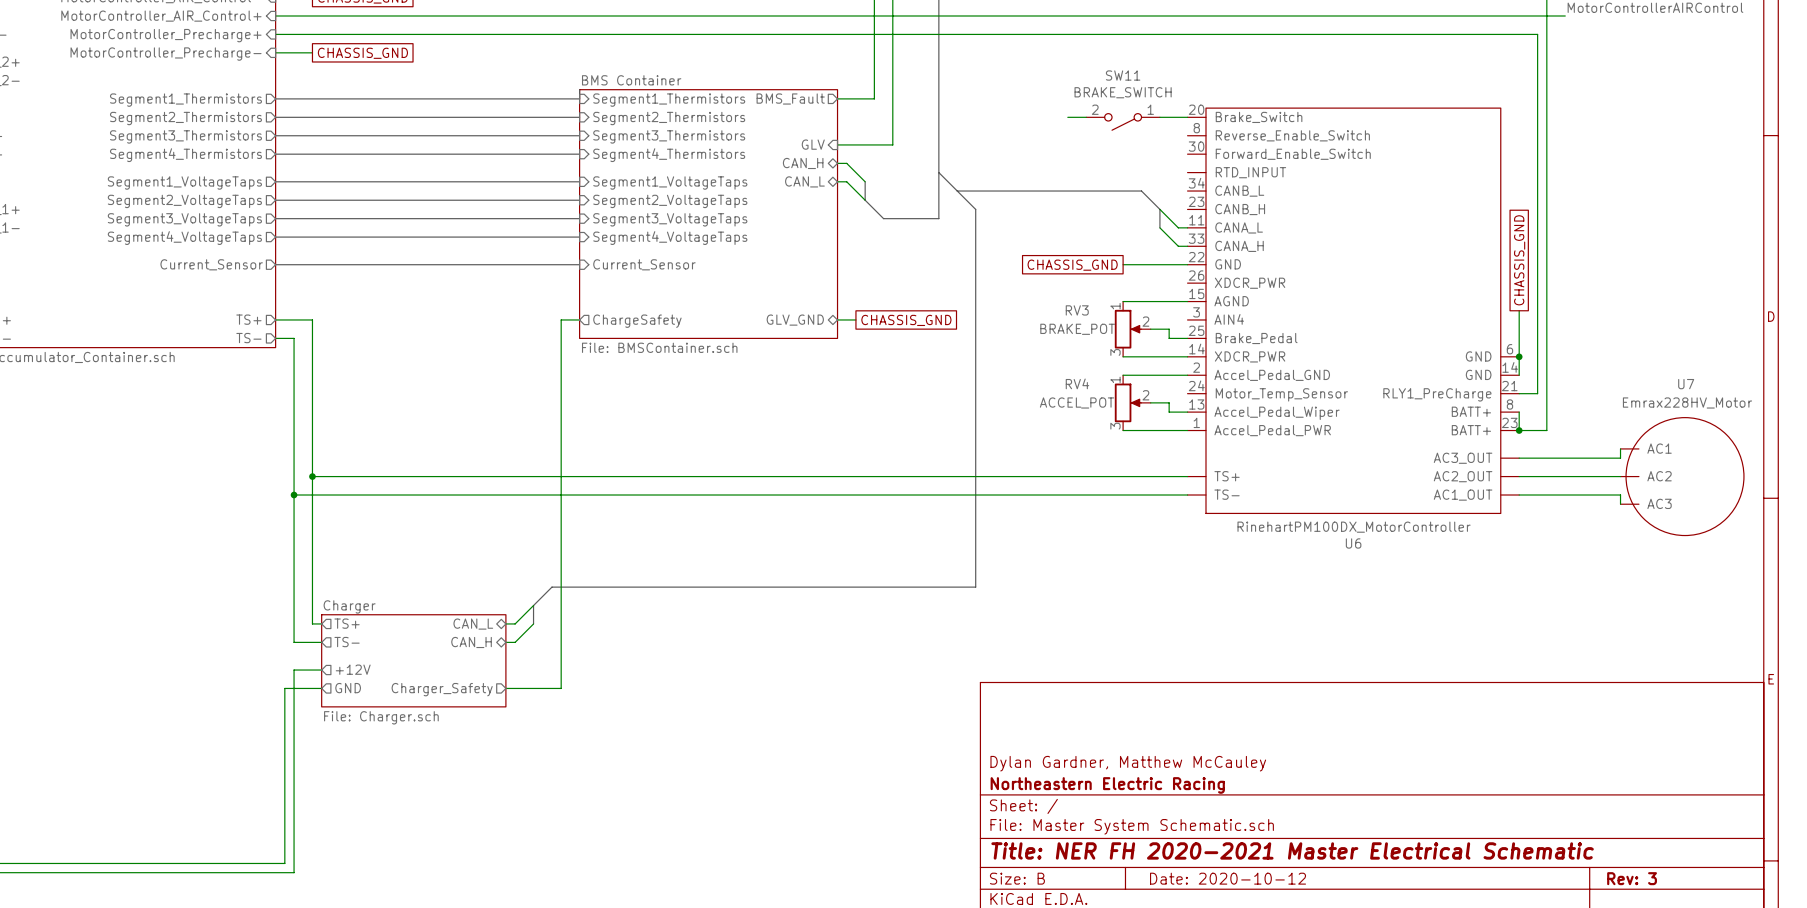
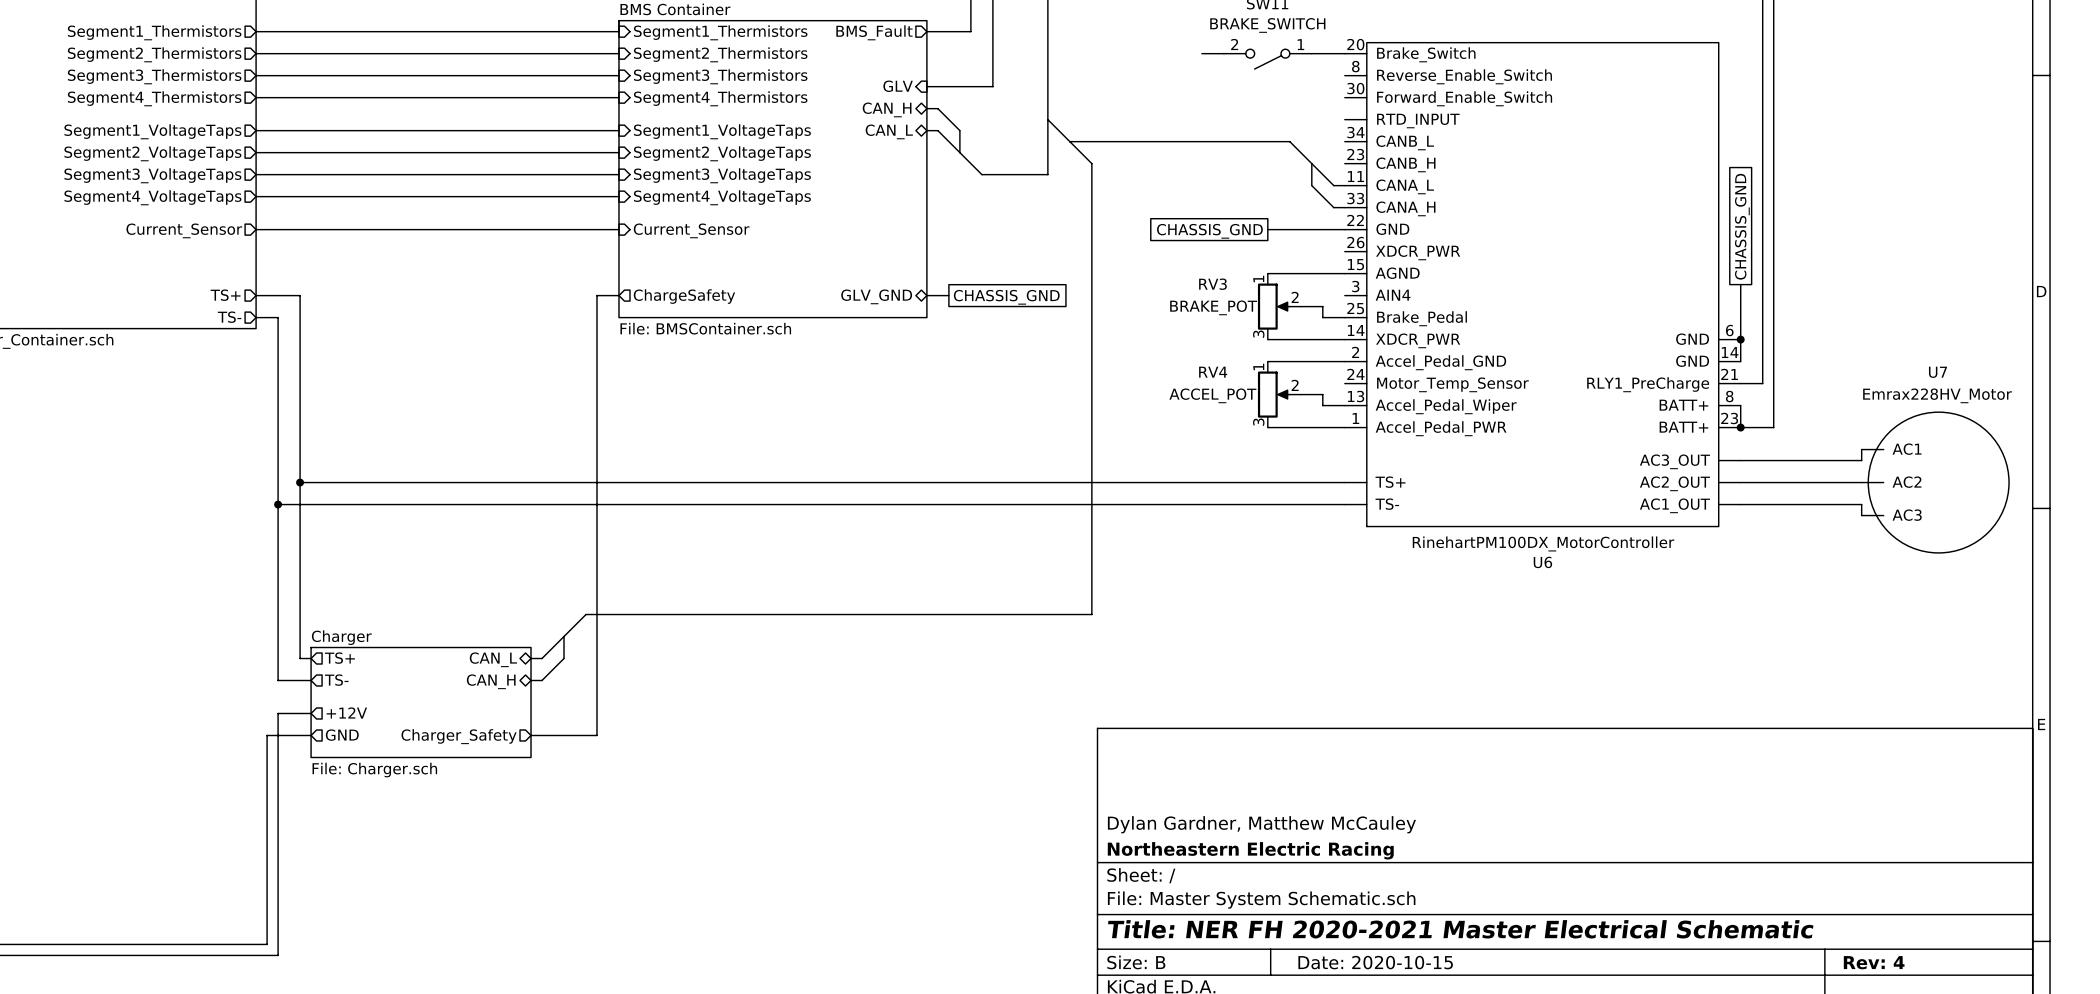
title block: Date: 2020-10-12 (1228, 878) -> Date: 2020-10-15 (1375, 962)
title block: Rev: 3 (1632, 878) -> Rev: 4 (1874, 962)

